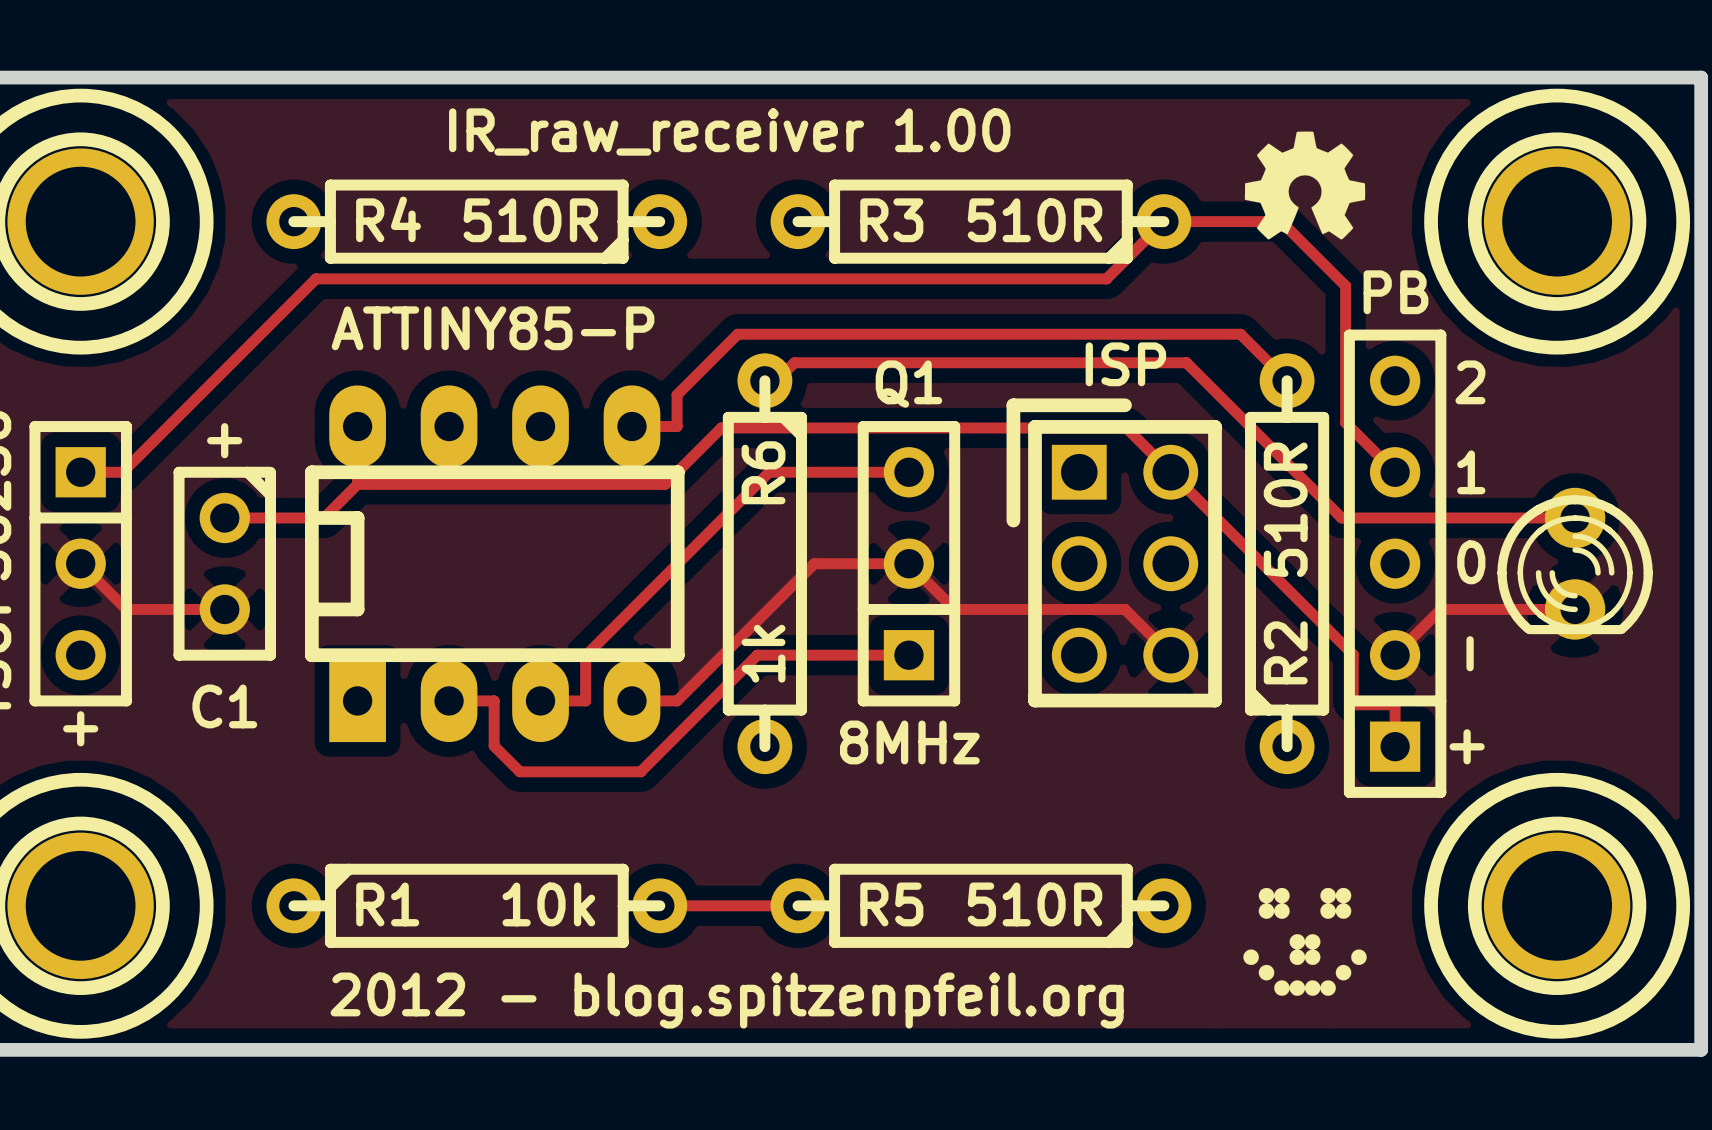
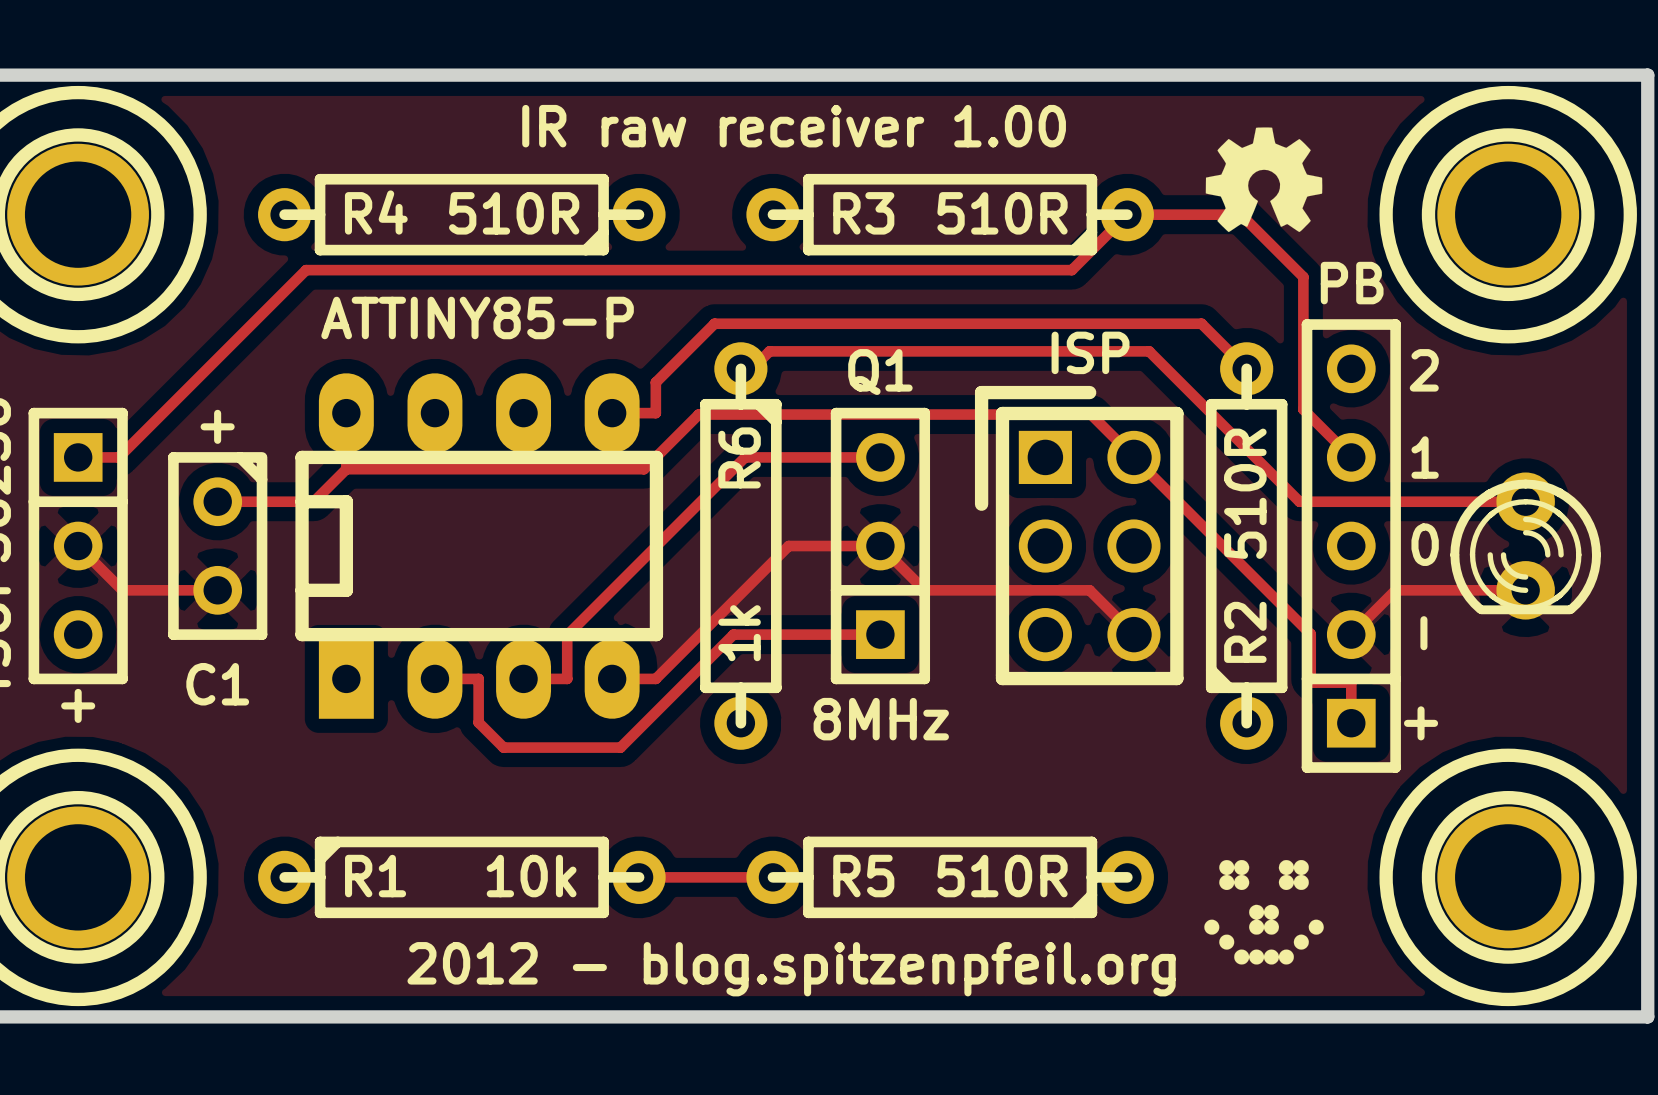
text: IR_raw_receiver 1.00 (729, 132) -> IR raw receiver 1.00 (794, 126)
text position: 2012 - blog.spitzenpfeil.org (727, 1000) -> 2012 - blog.spitzenpfeil.org (791, 969)

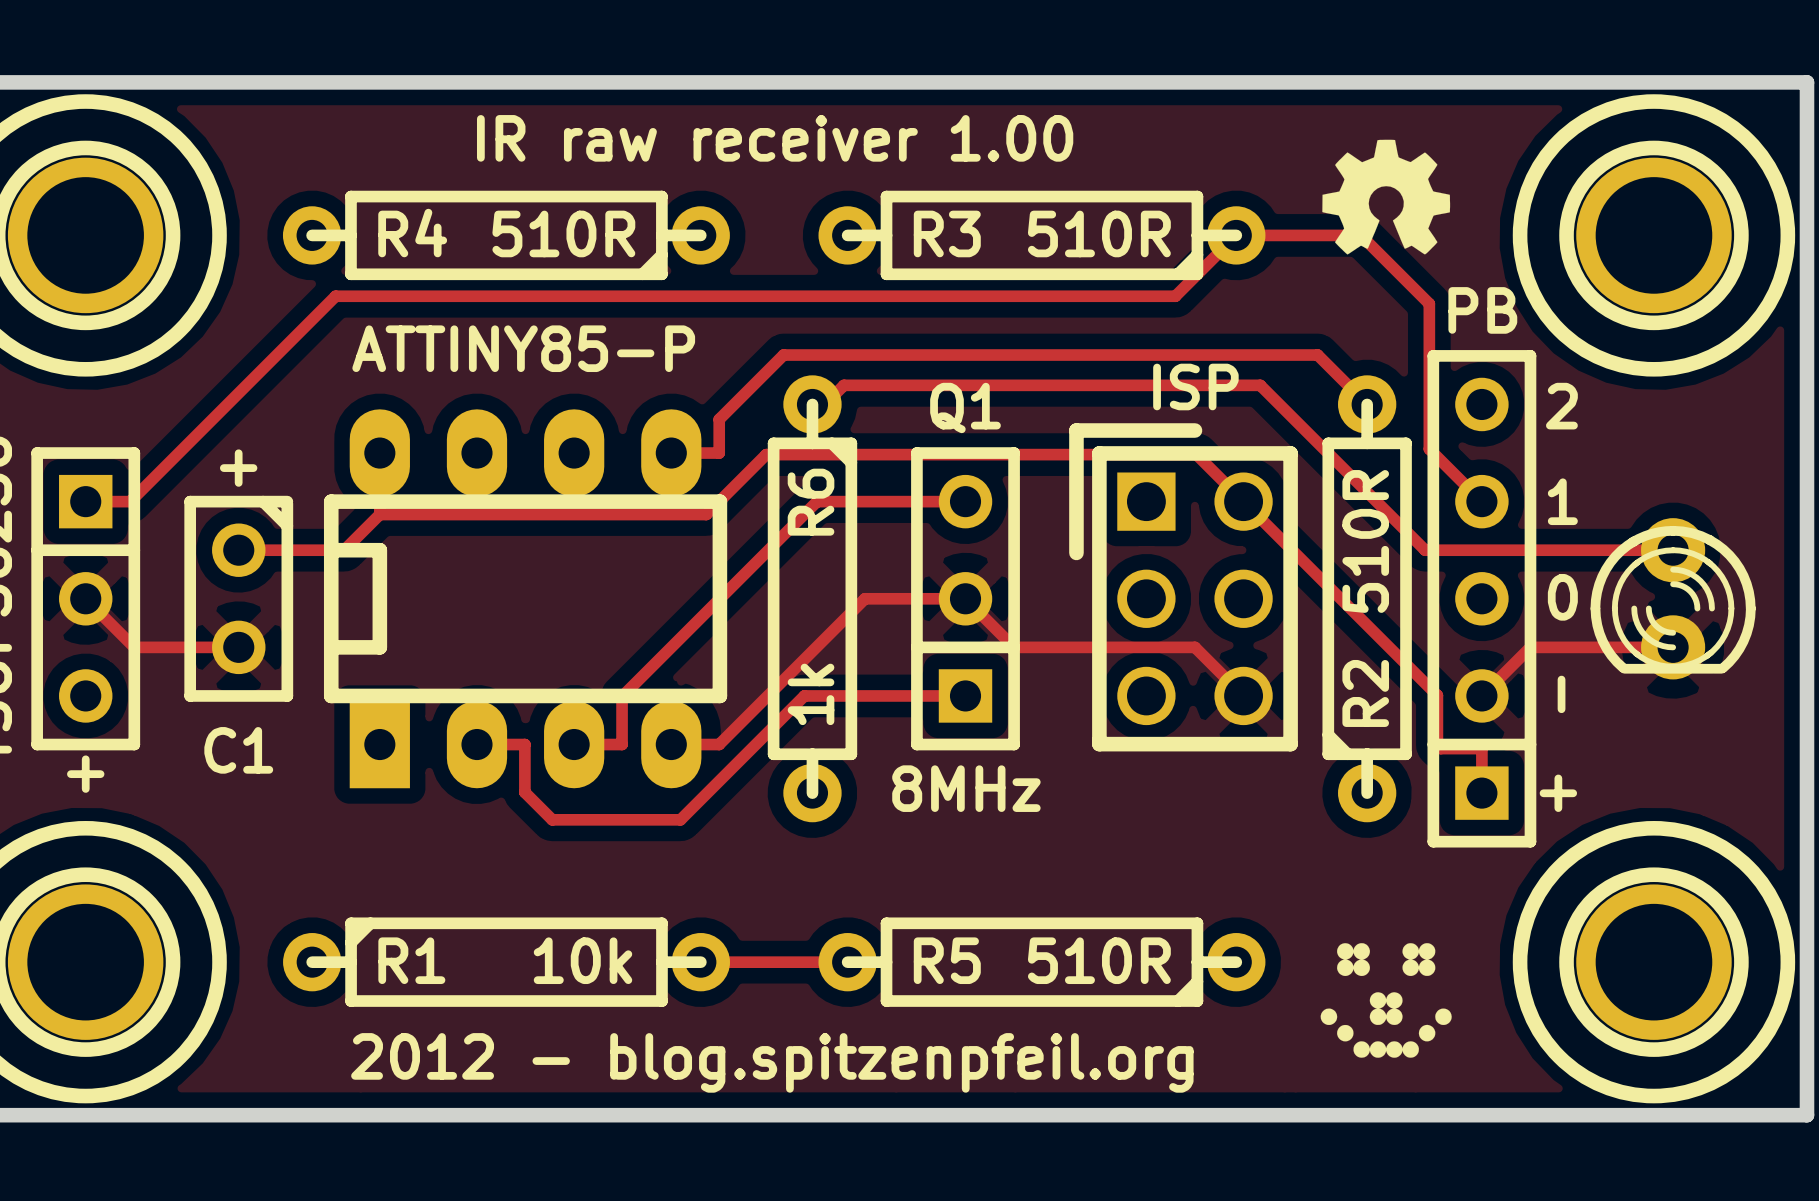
text position: IR raw receiver 1.00 (794, 126) -> IR raw receiver 1.00 (775, 138)
text position: 2012 - blog.spitzenpfeil.org (791, 969) -> 2012 - blog.spitzenpfeil.org (772, 1062)

